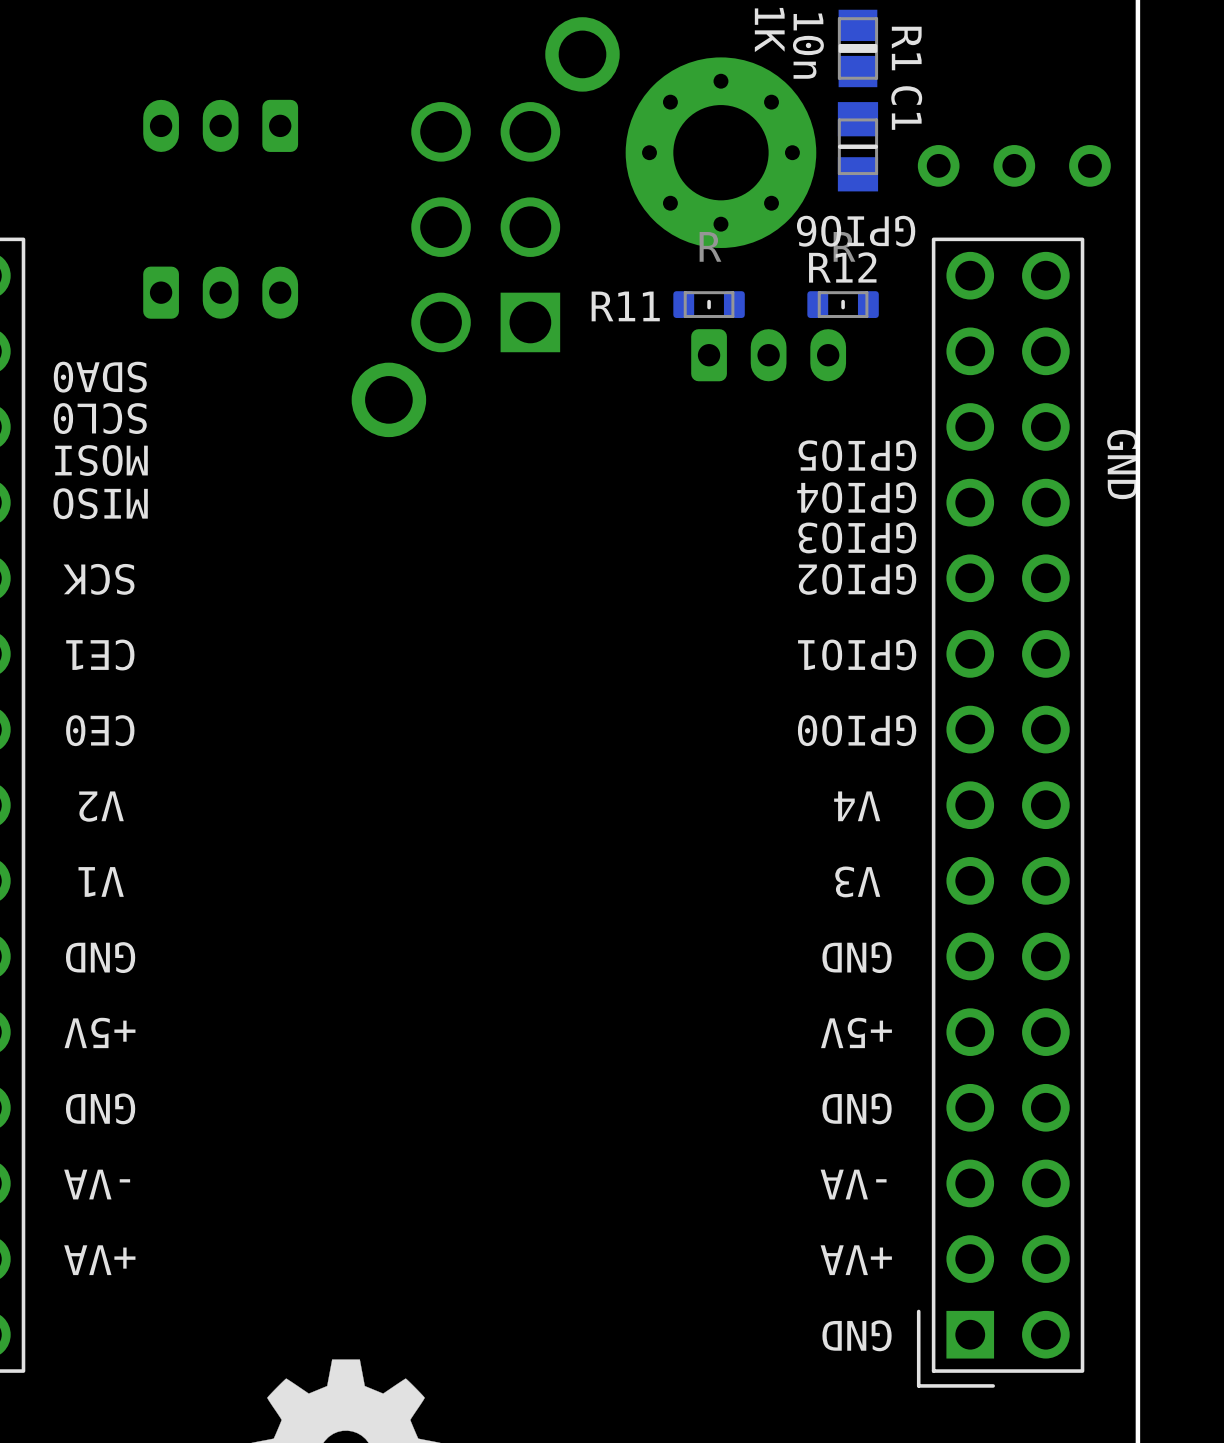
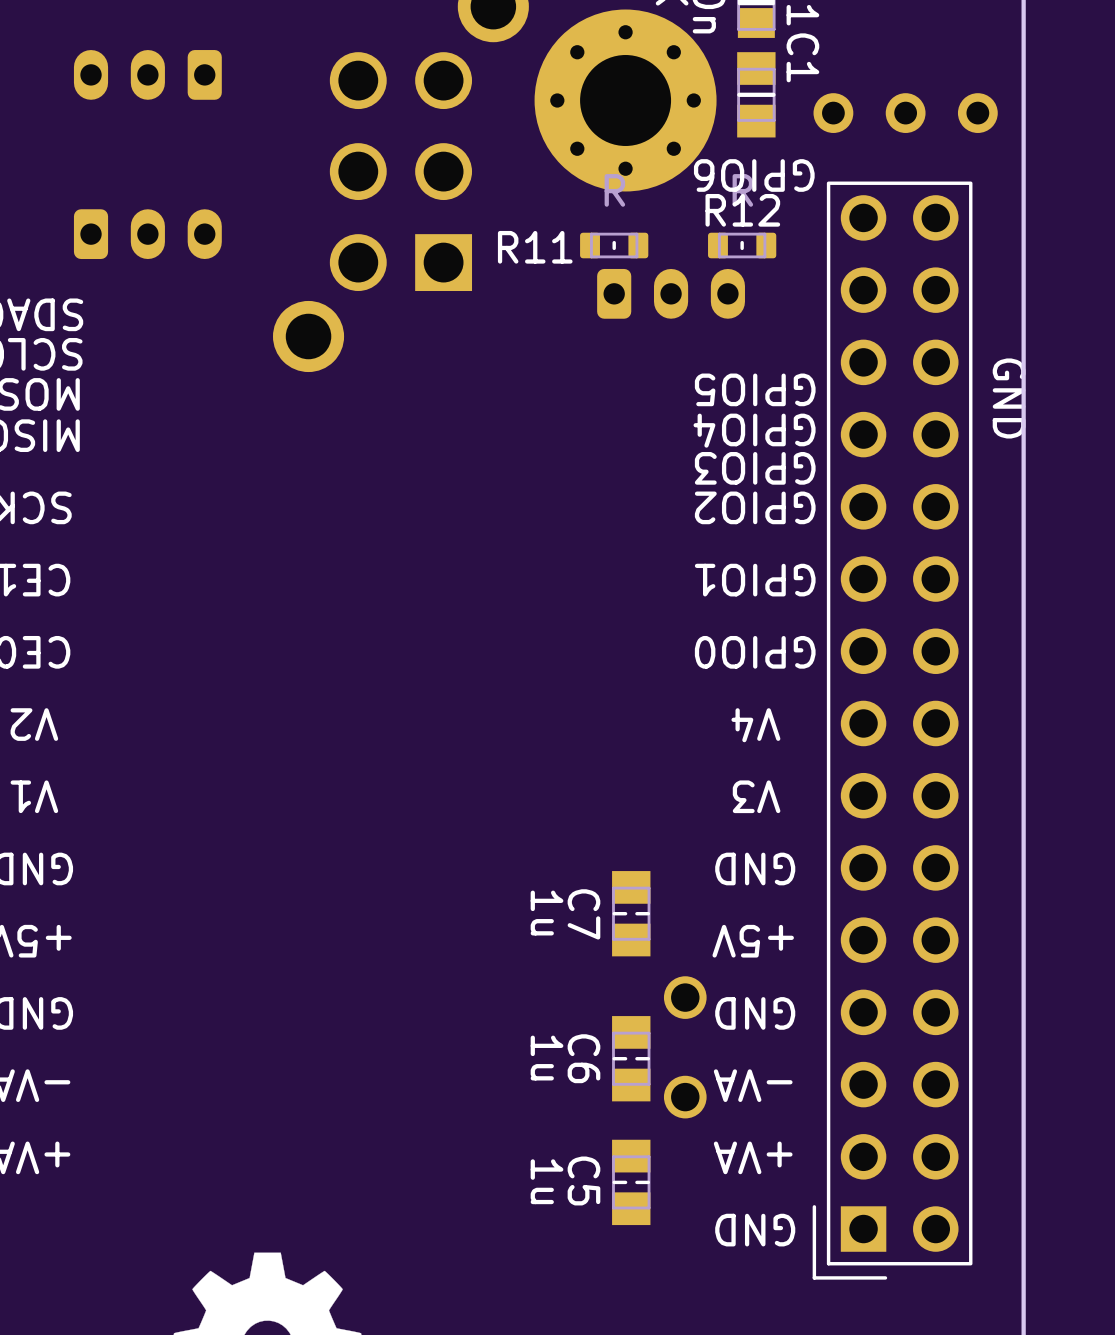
C7: none -> 1u (631, 913)
part: none -> (685, 1047)
C6: none -> 1u (631, 1058)
C5: none -> 1u (631, 1182)

